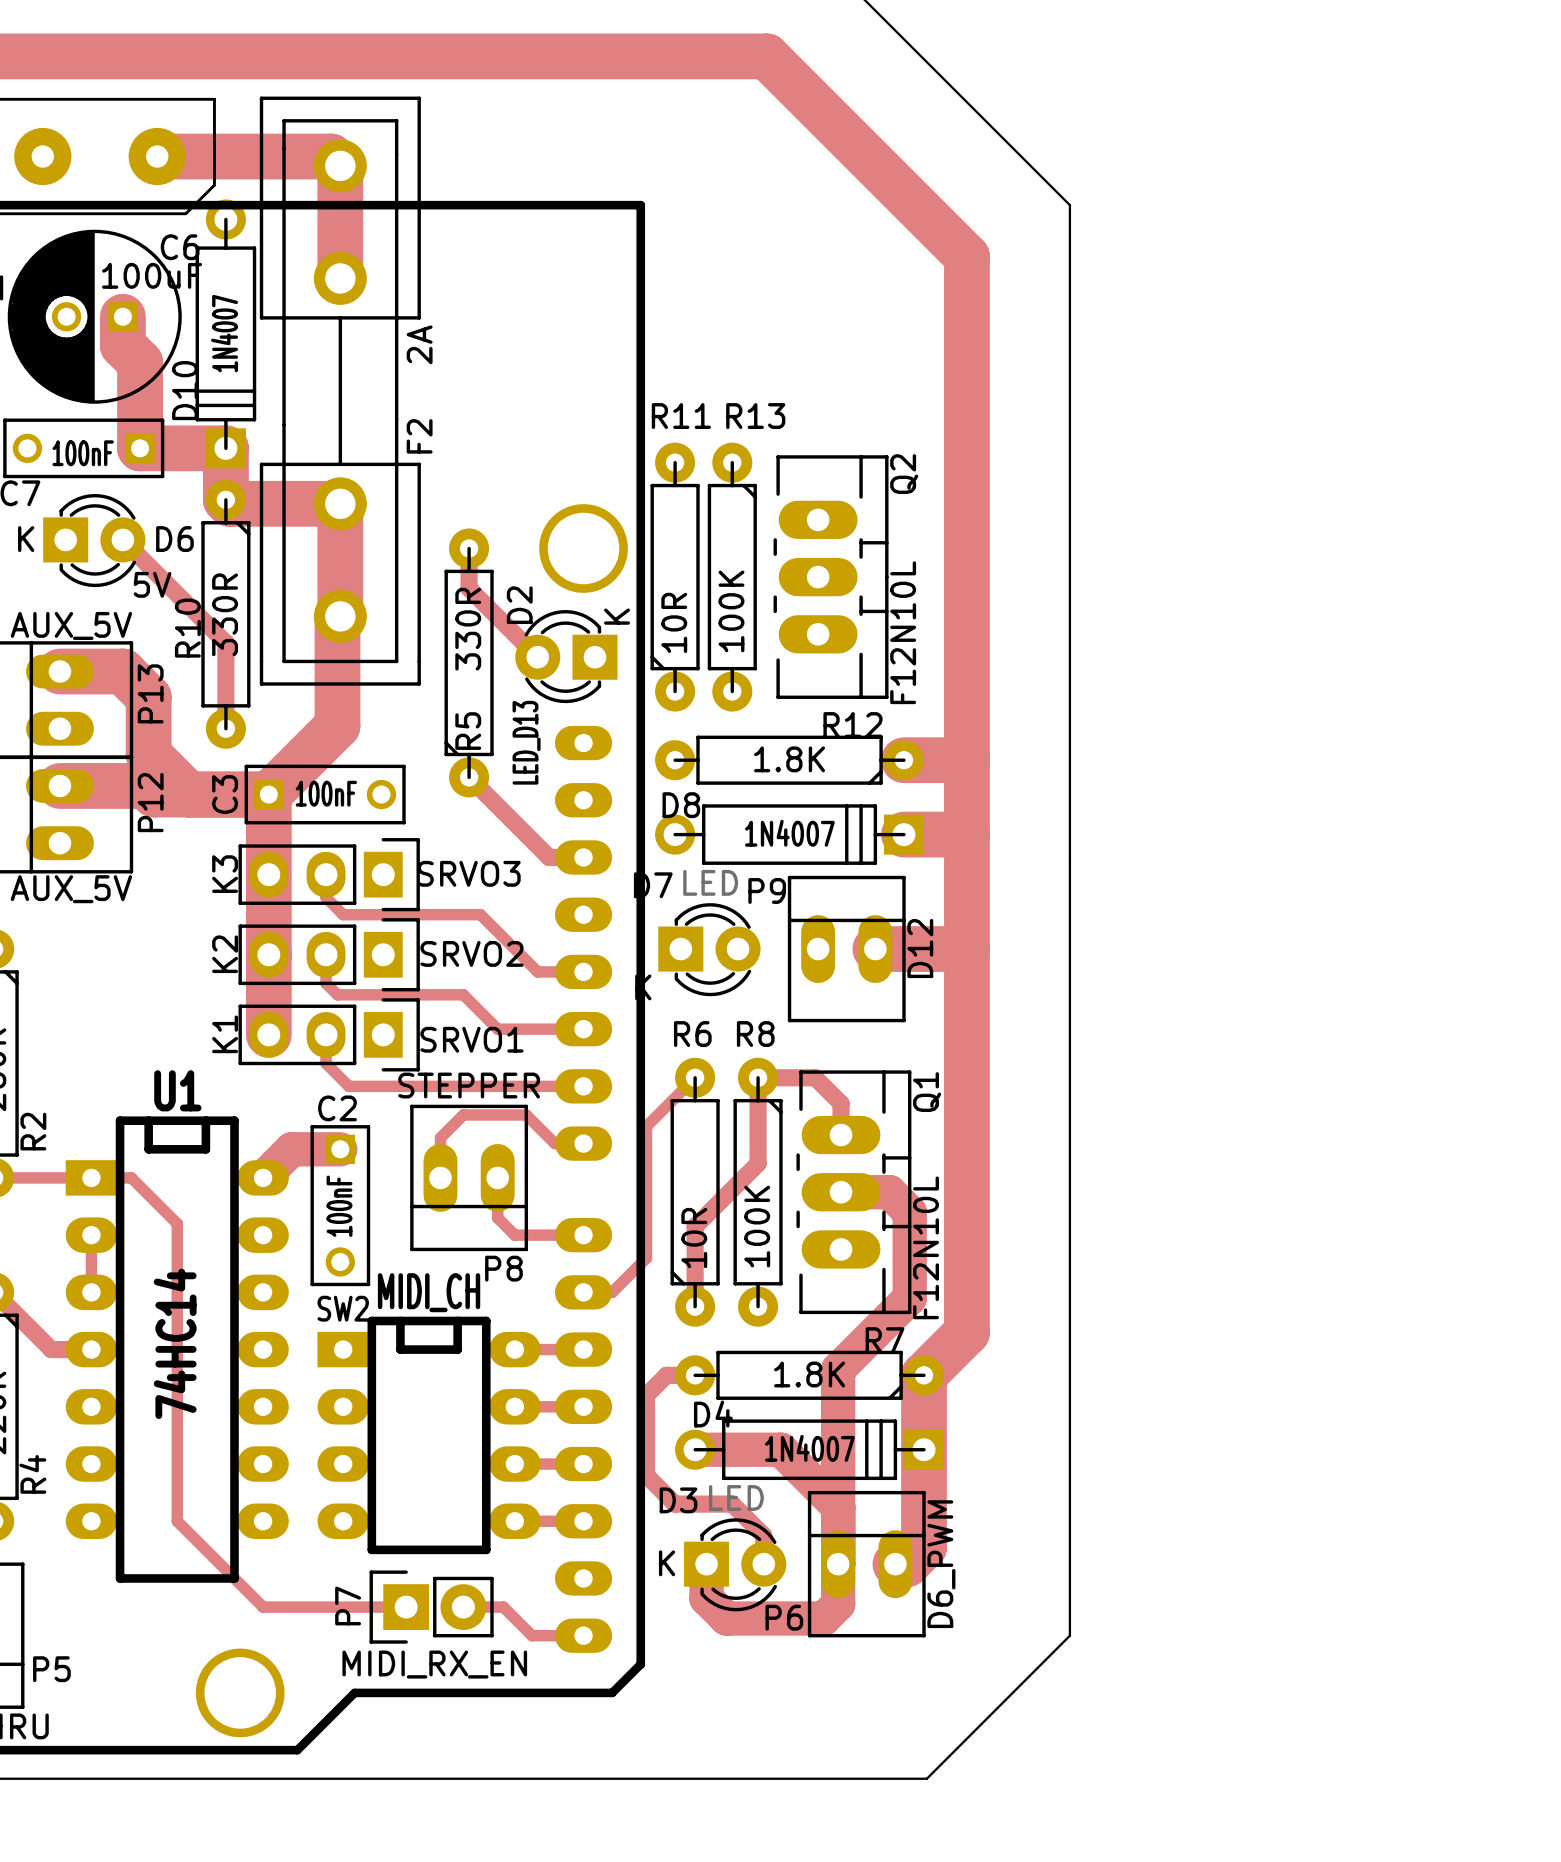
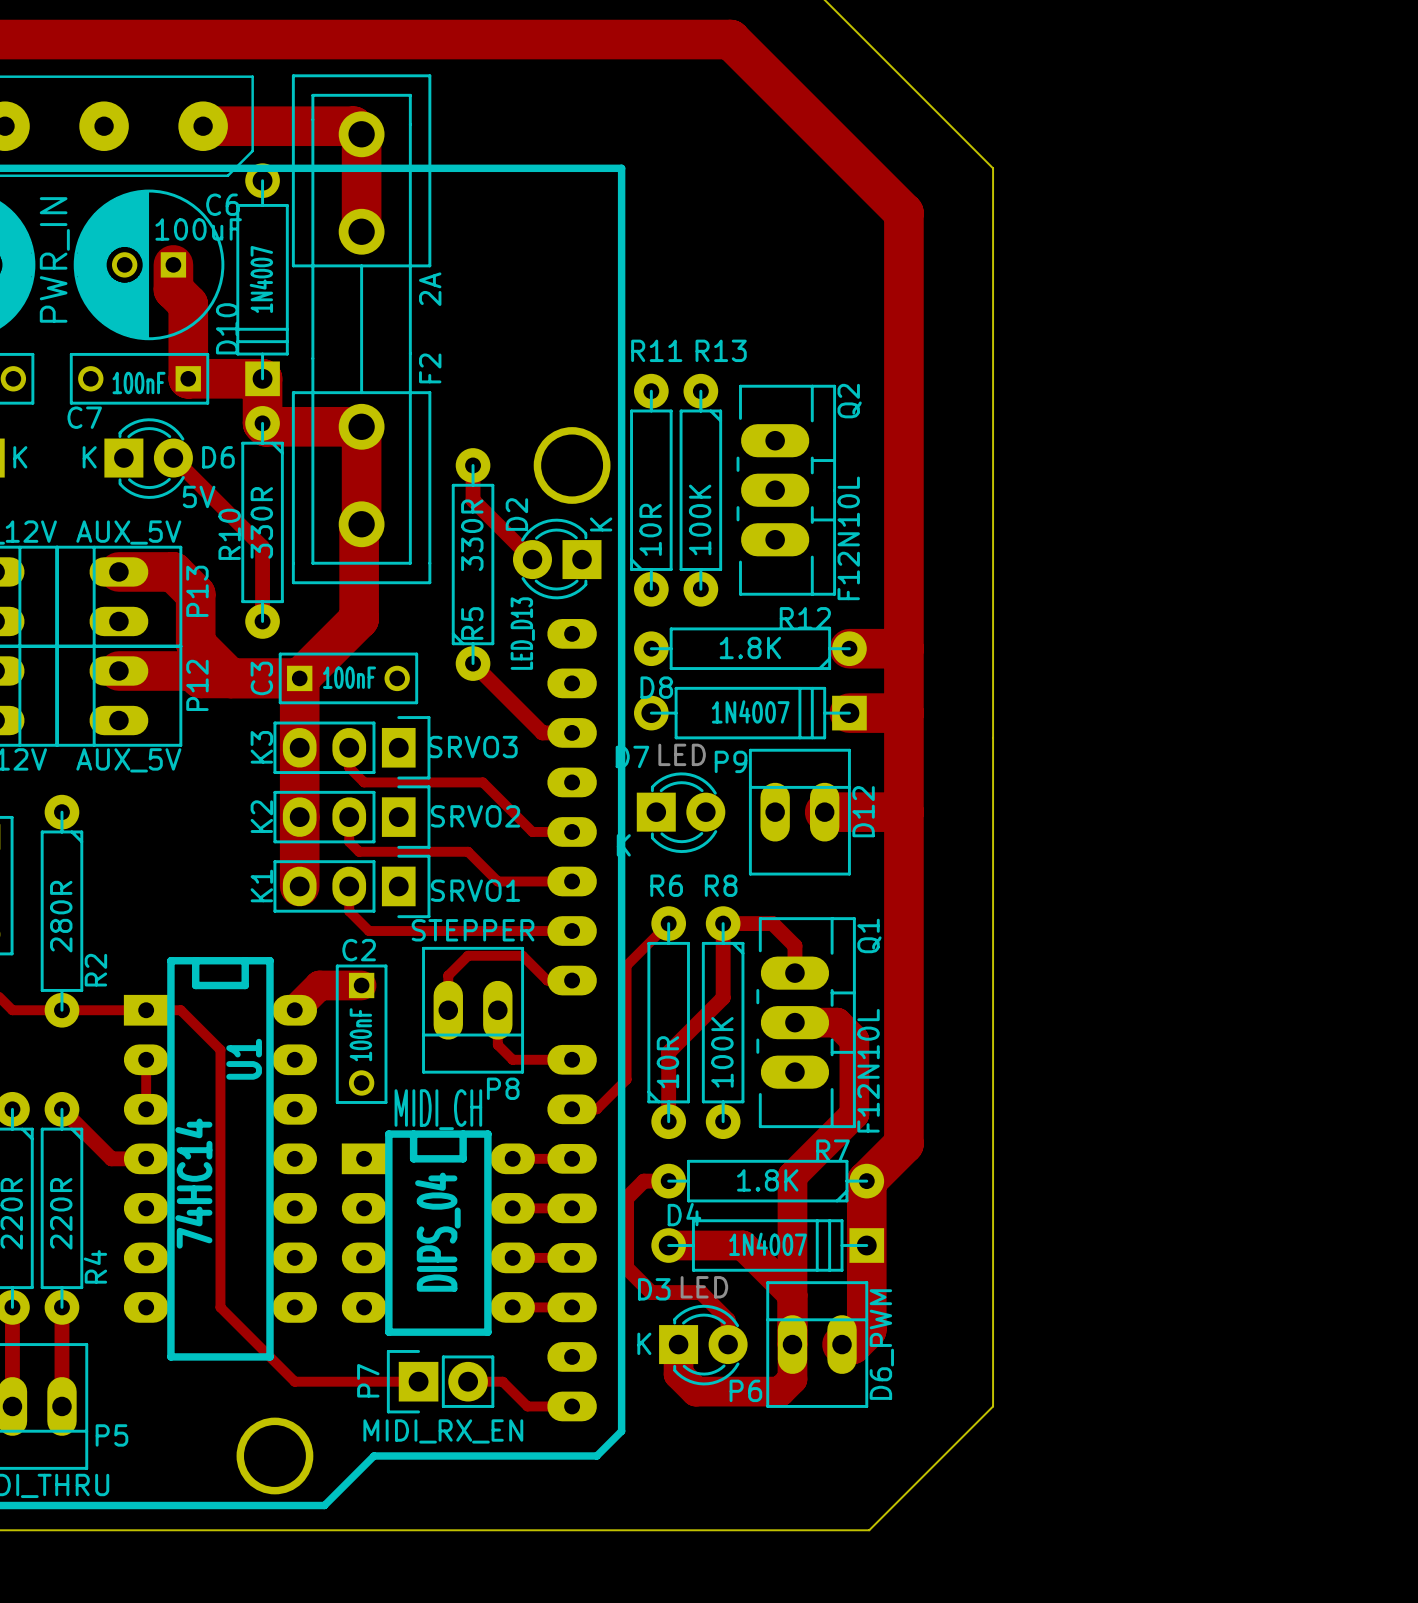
U1 name rotation: 0° (177, 1090) -> 90° counterclockwise (244, 1059)
U1 name position: U1 (177, 1090) -> U1 (244, 1059)
SW2 value: MIDI_CH (429, 1292) -> DIPS_04 (437, 1232)
SW2 name: SW2 (343, 1308) -> MIDI_CH (438, 1109)
U1 value position: 74HC14 (175, 1343) -> 74HC14 (193, 1183)

